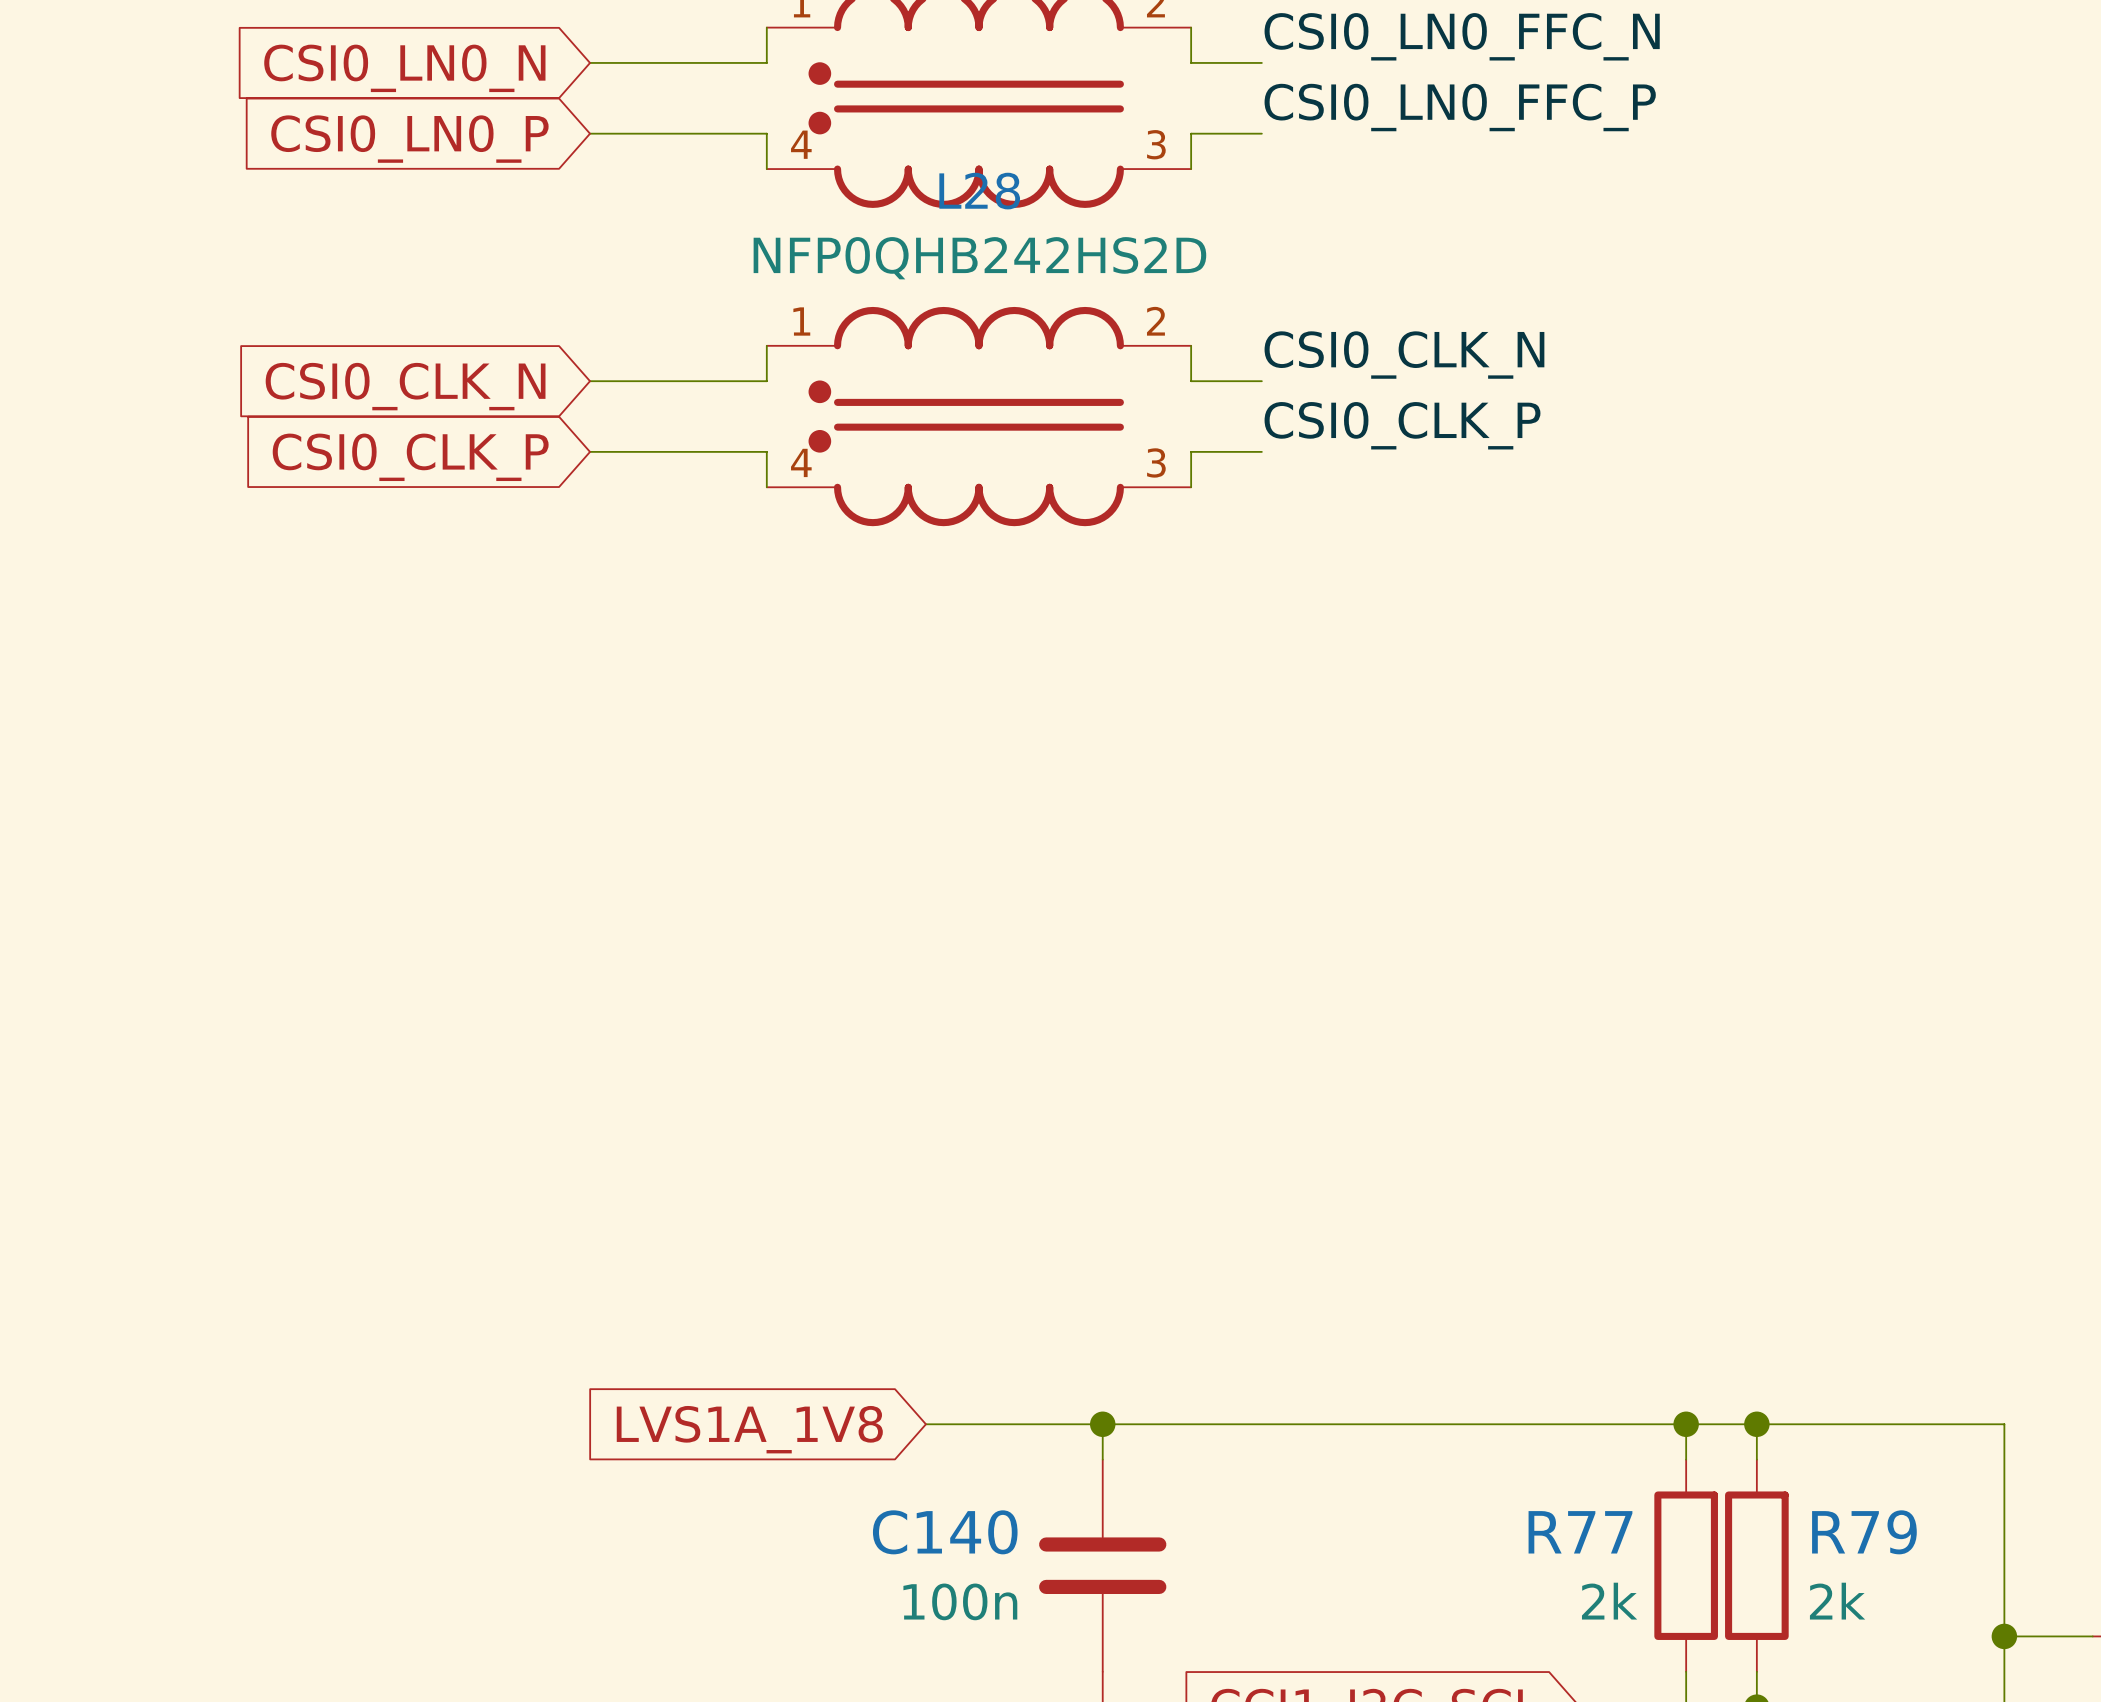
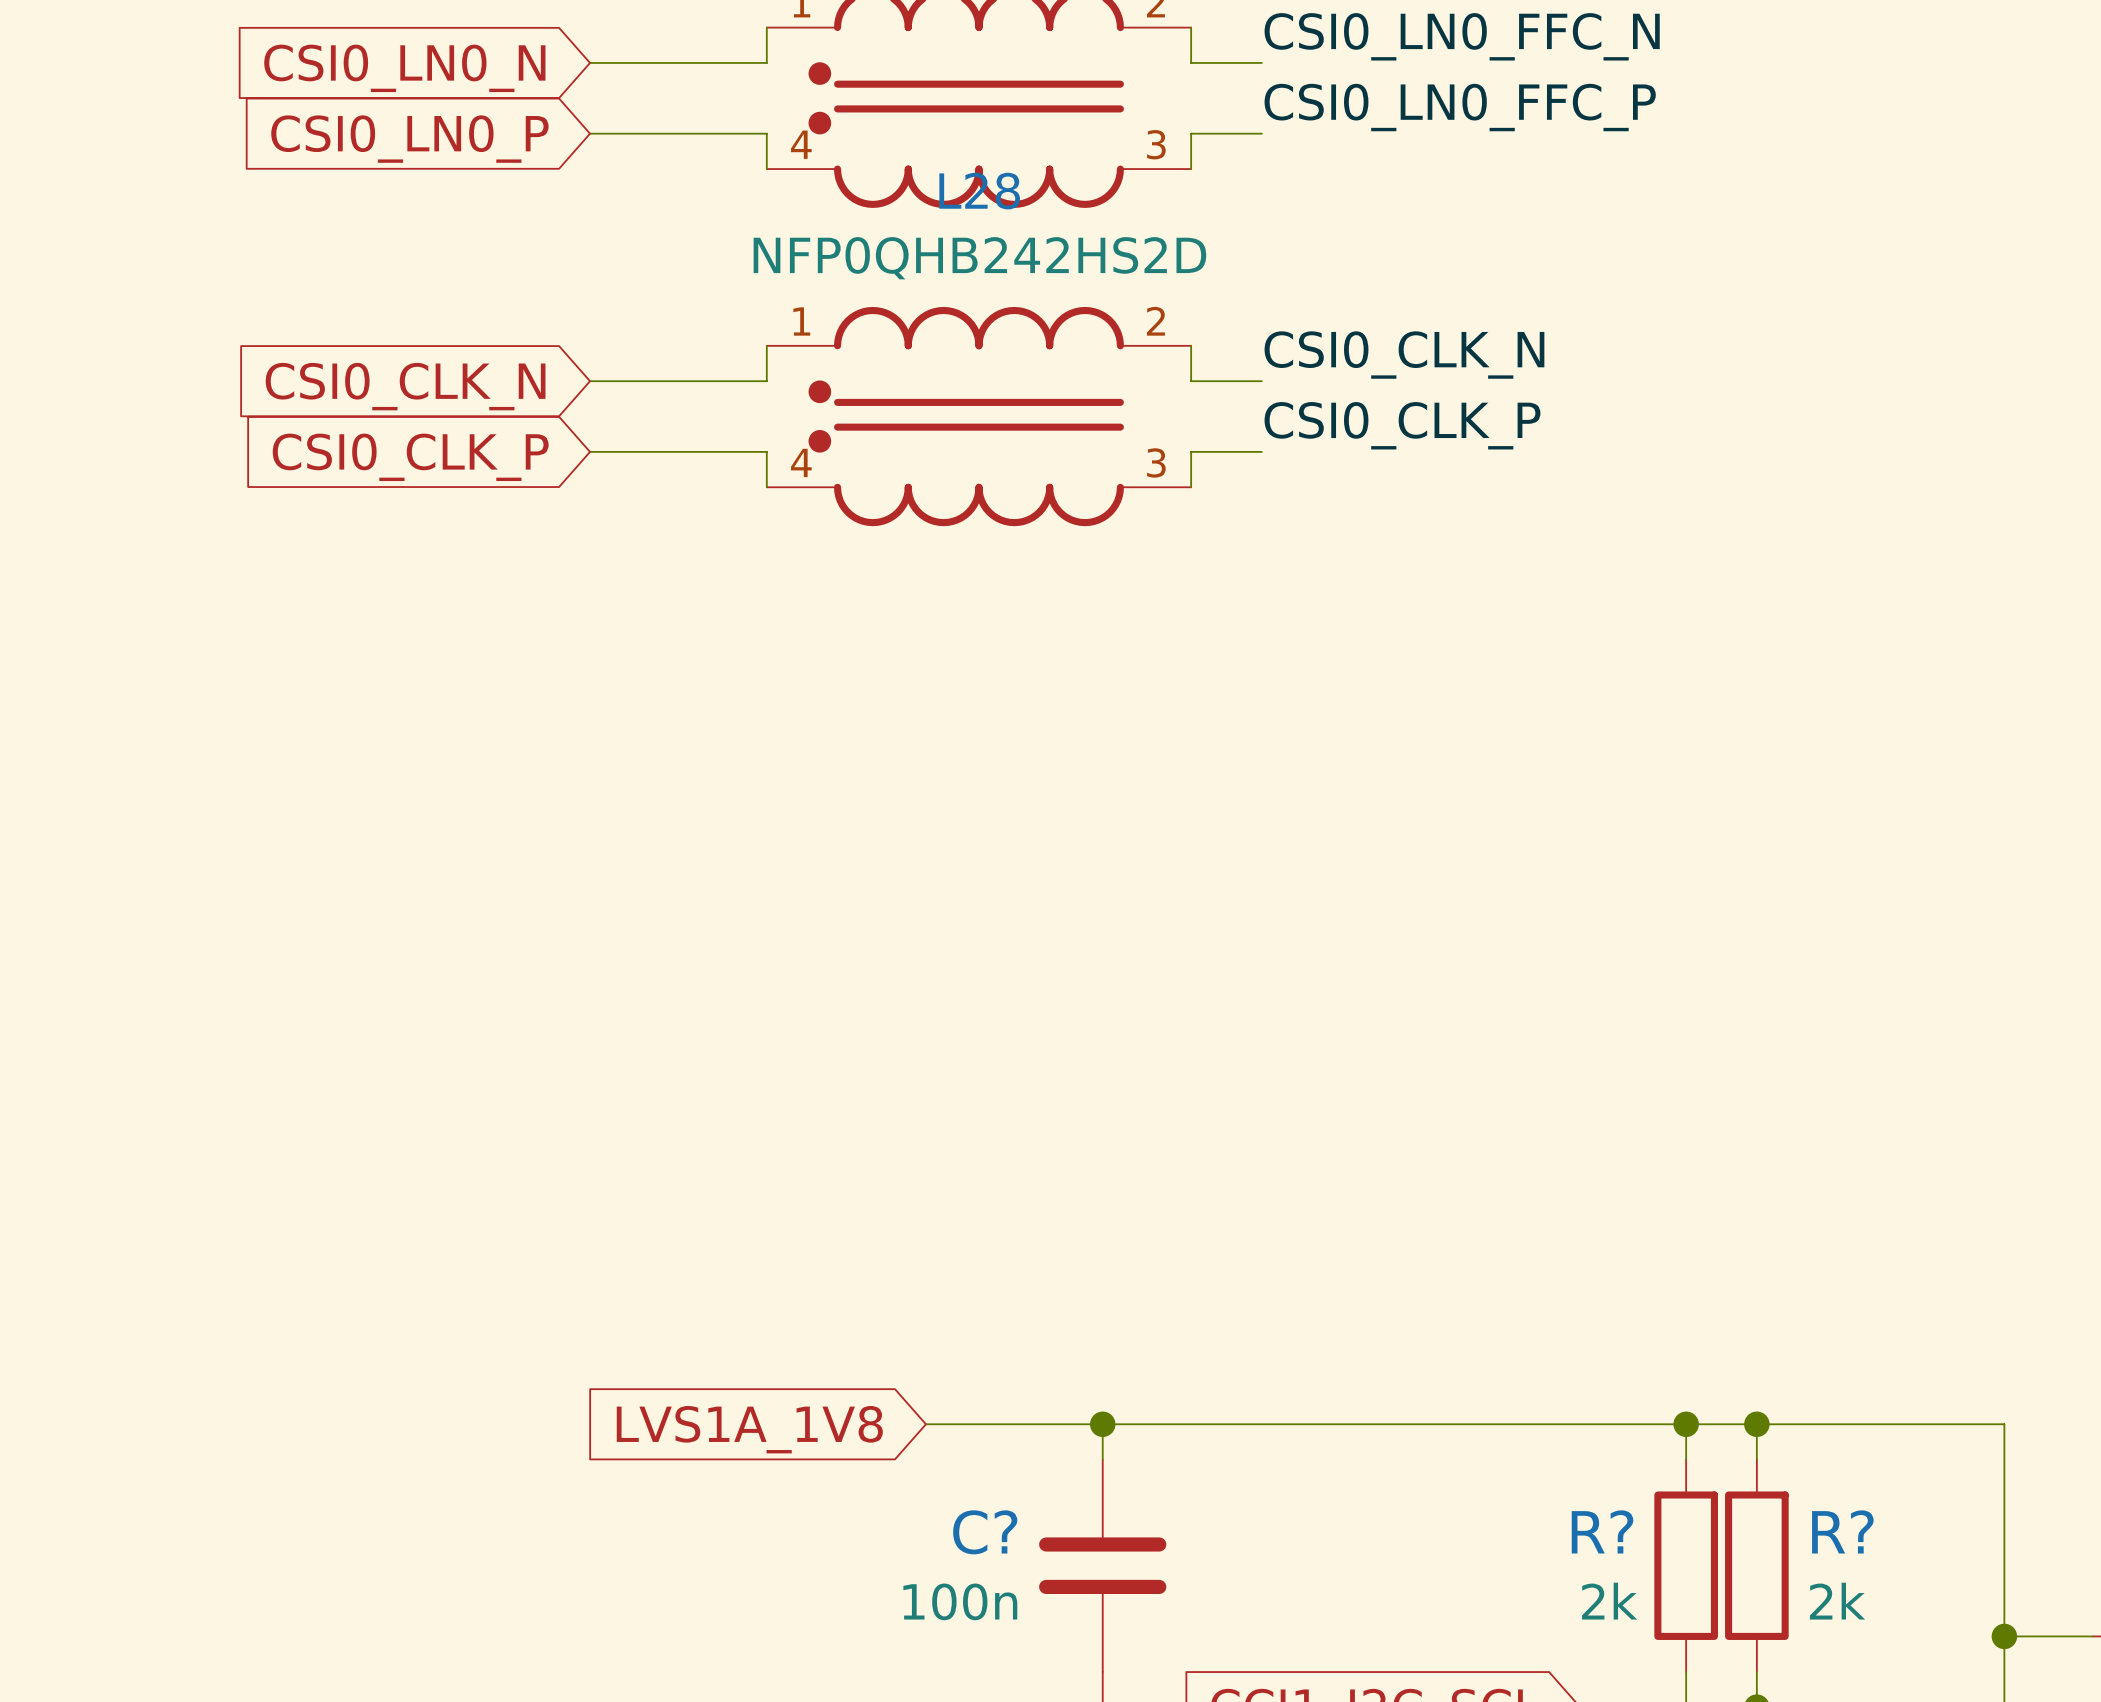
C140 name: C140 (945, 1532) -> C? (985, 1532)
R77 name: R77 (1580, 1532) -> R? (1602, 1531)
R79 name: R79 (1864, 1532) -> R? (1842, 1531)

